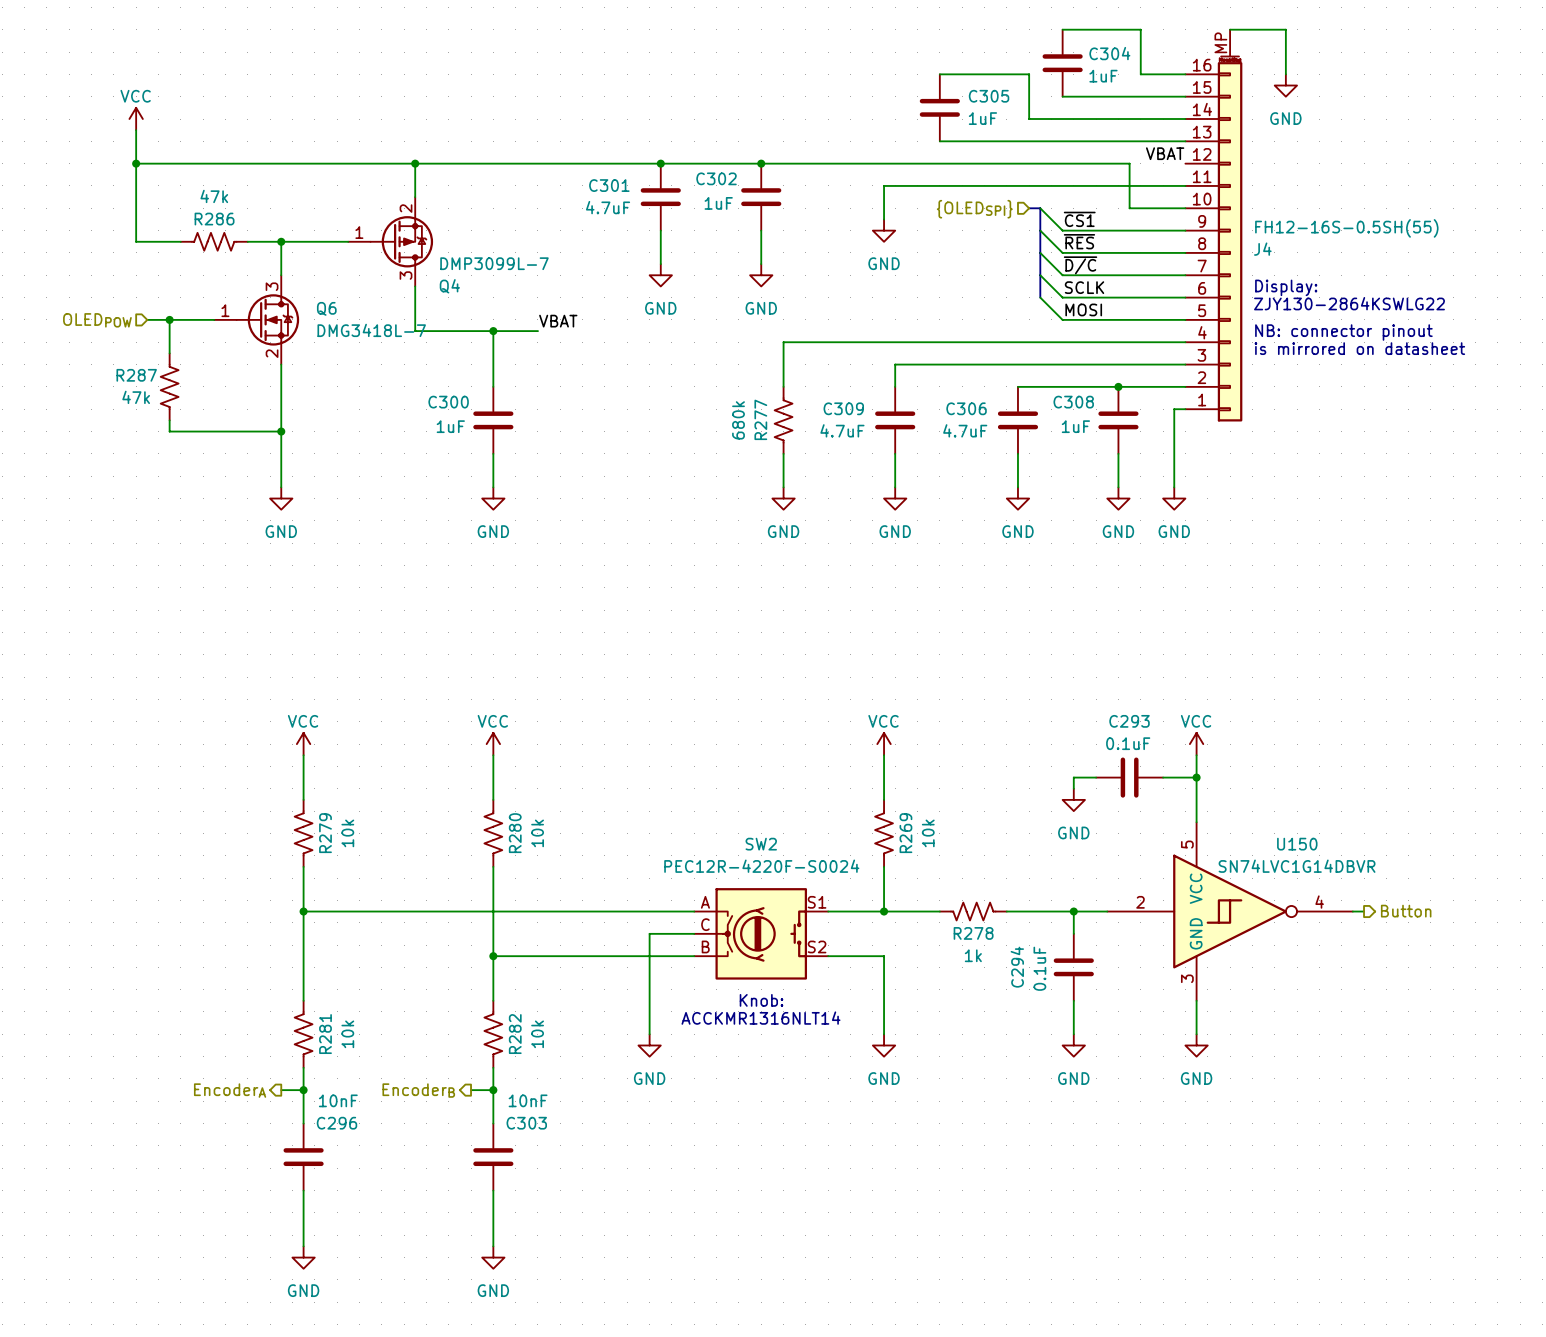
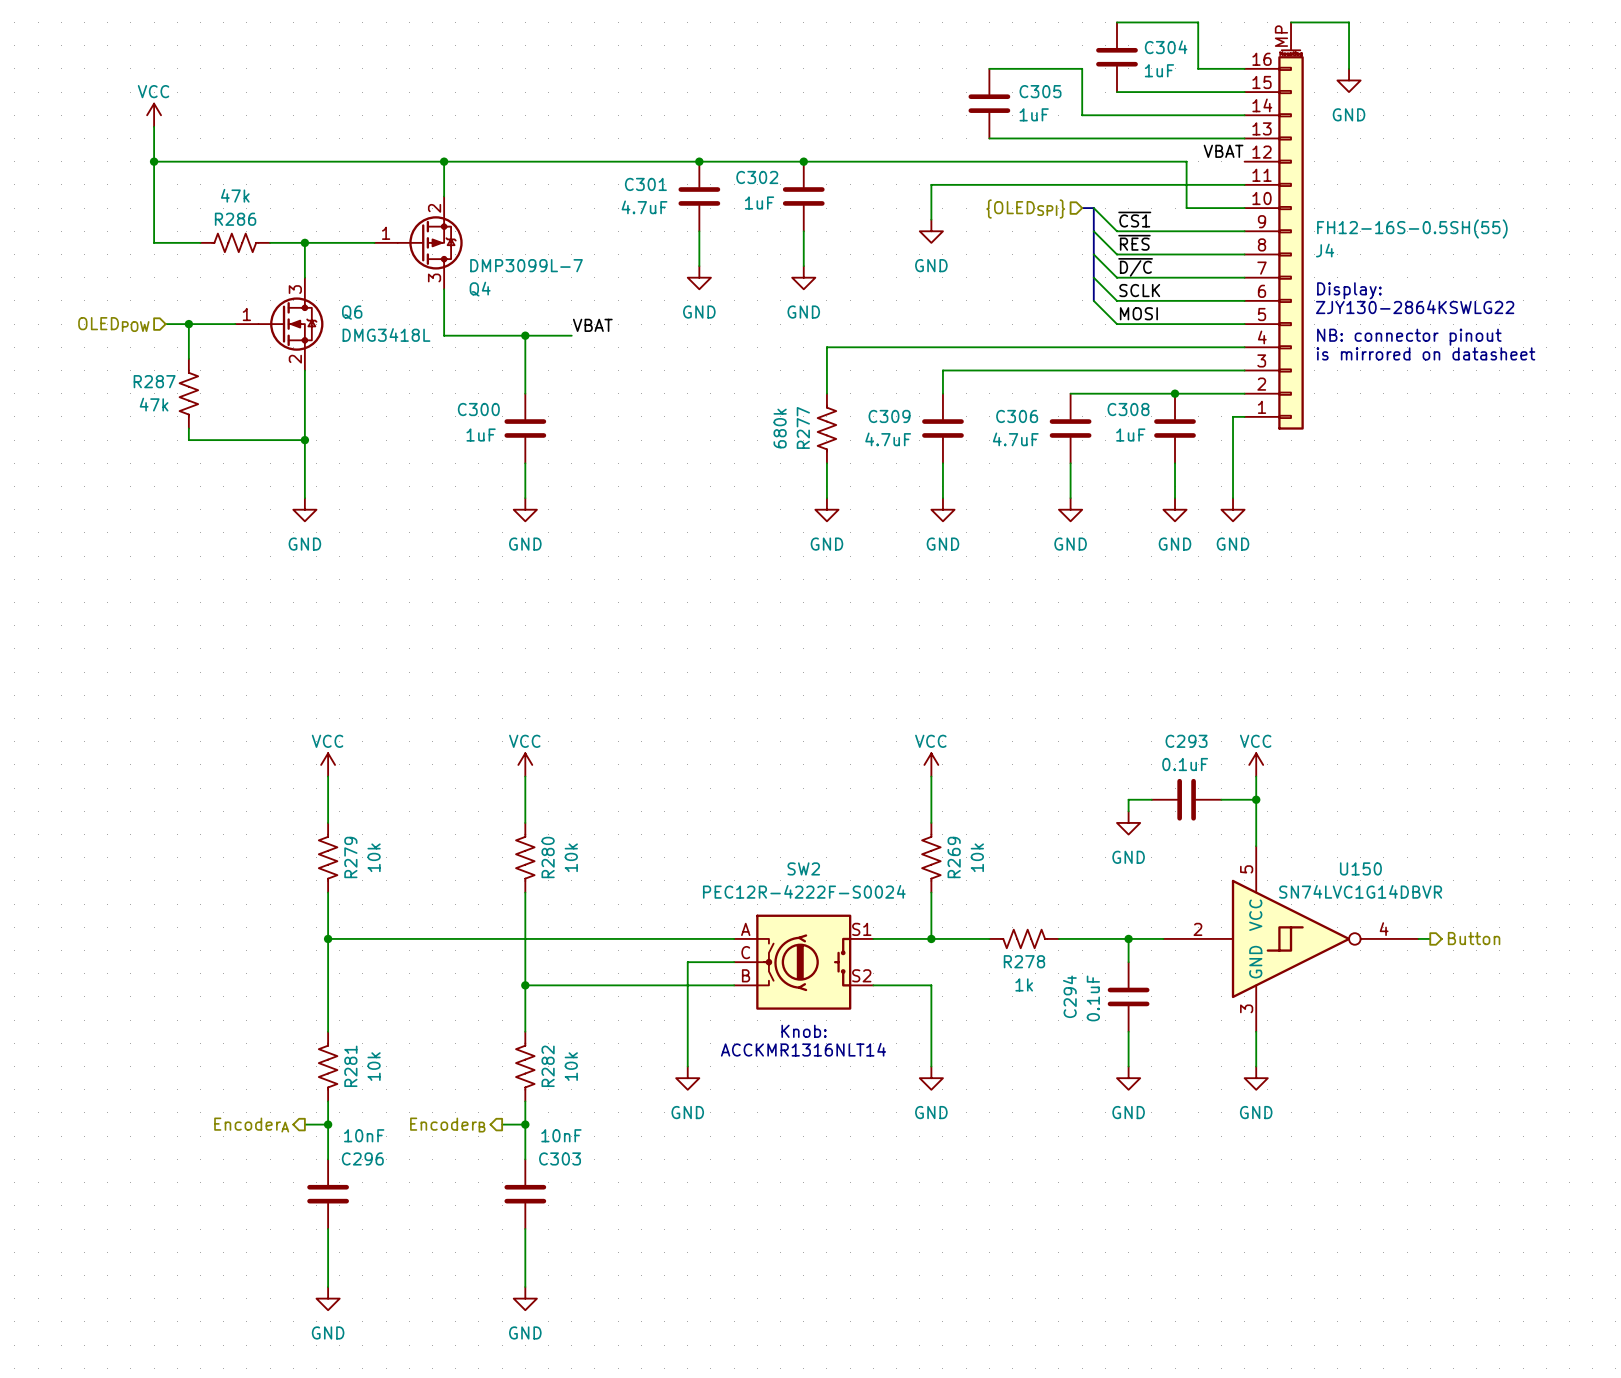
Q6 value: DMG3418L-7 (371, 330) -> DMG3418L (386, 334)
SW2 value: PEC12R-4220F-S0024 (761, 866) -> PEC12R-4222F-S0024 (804, 891)

